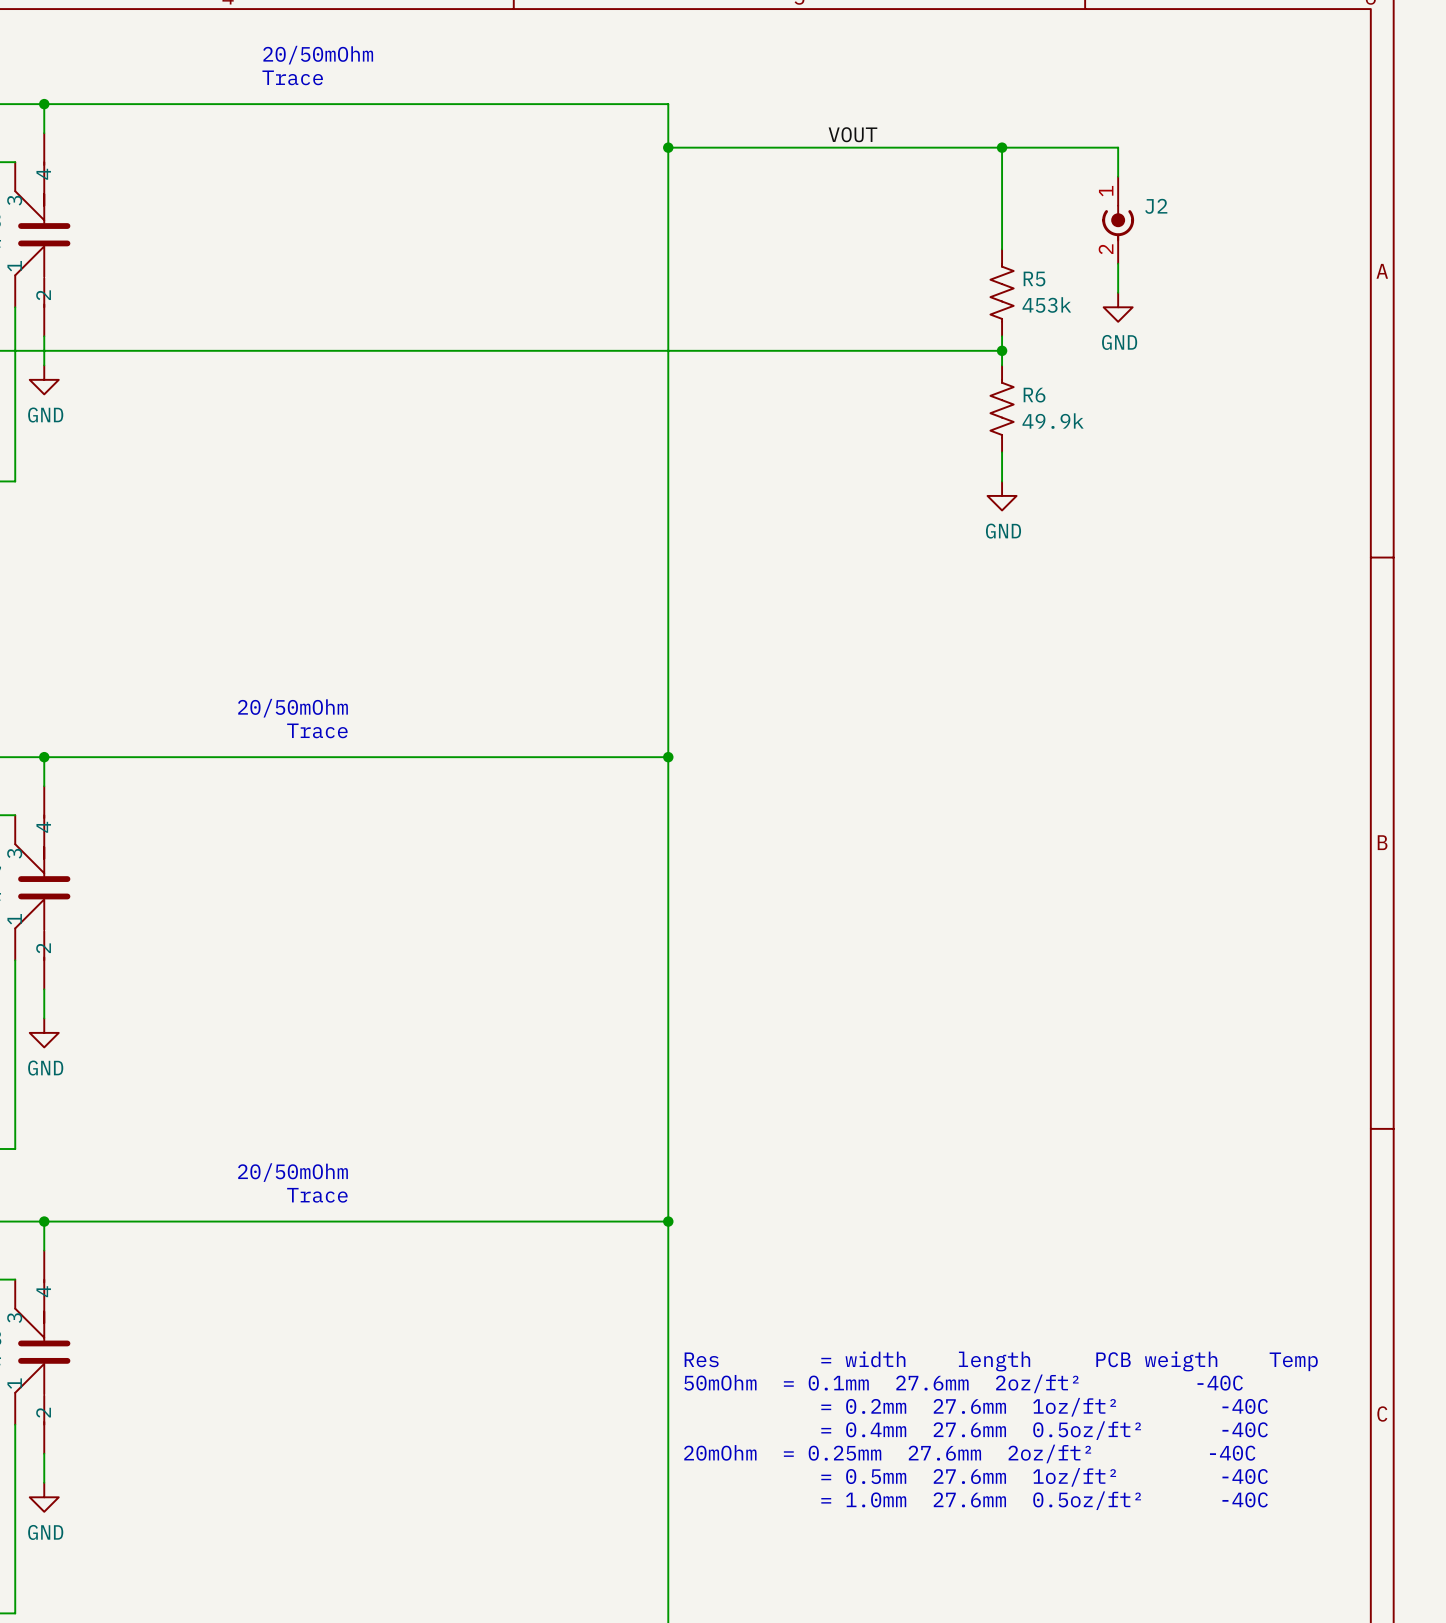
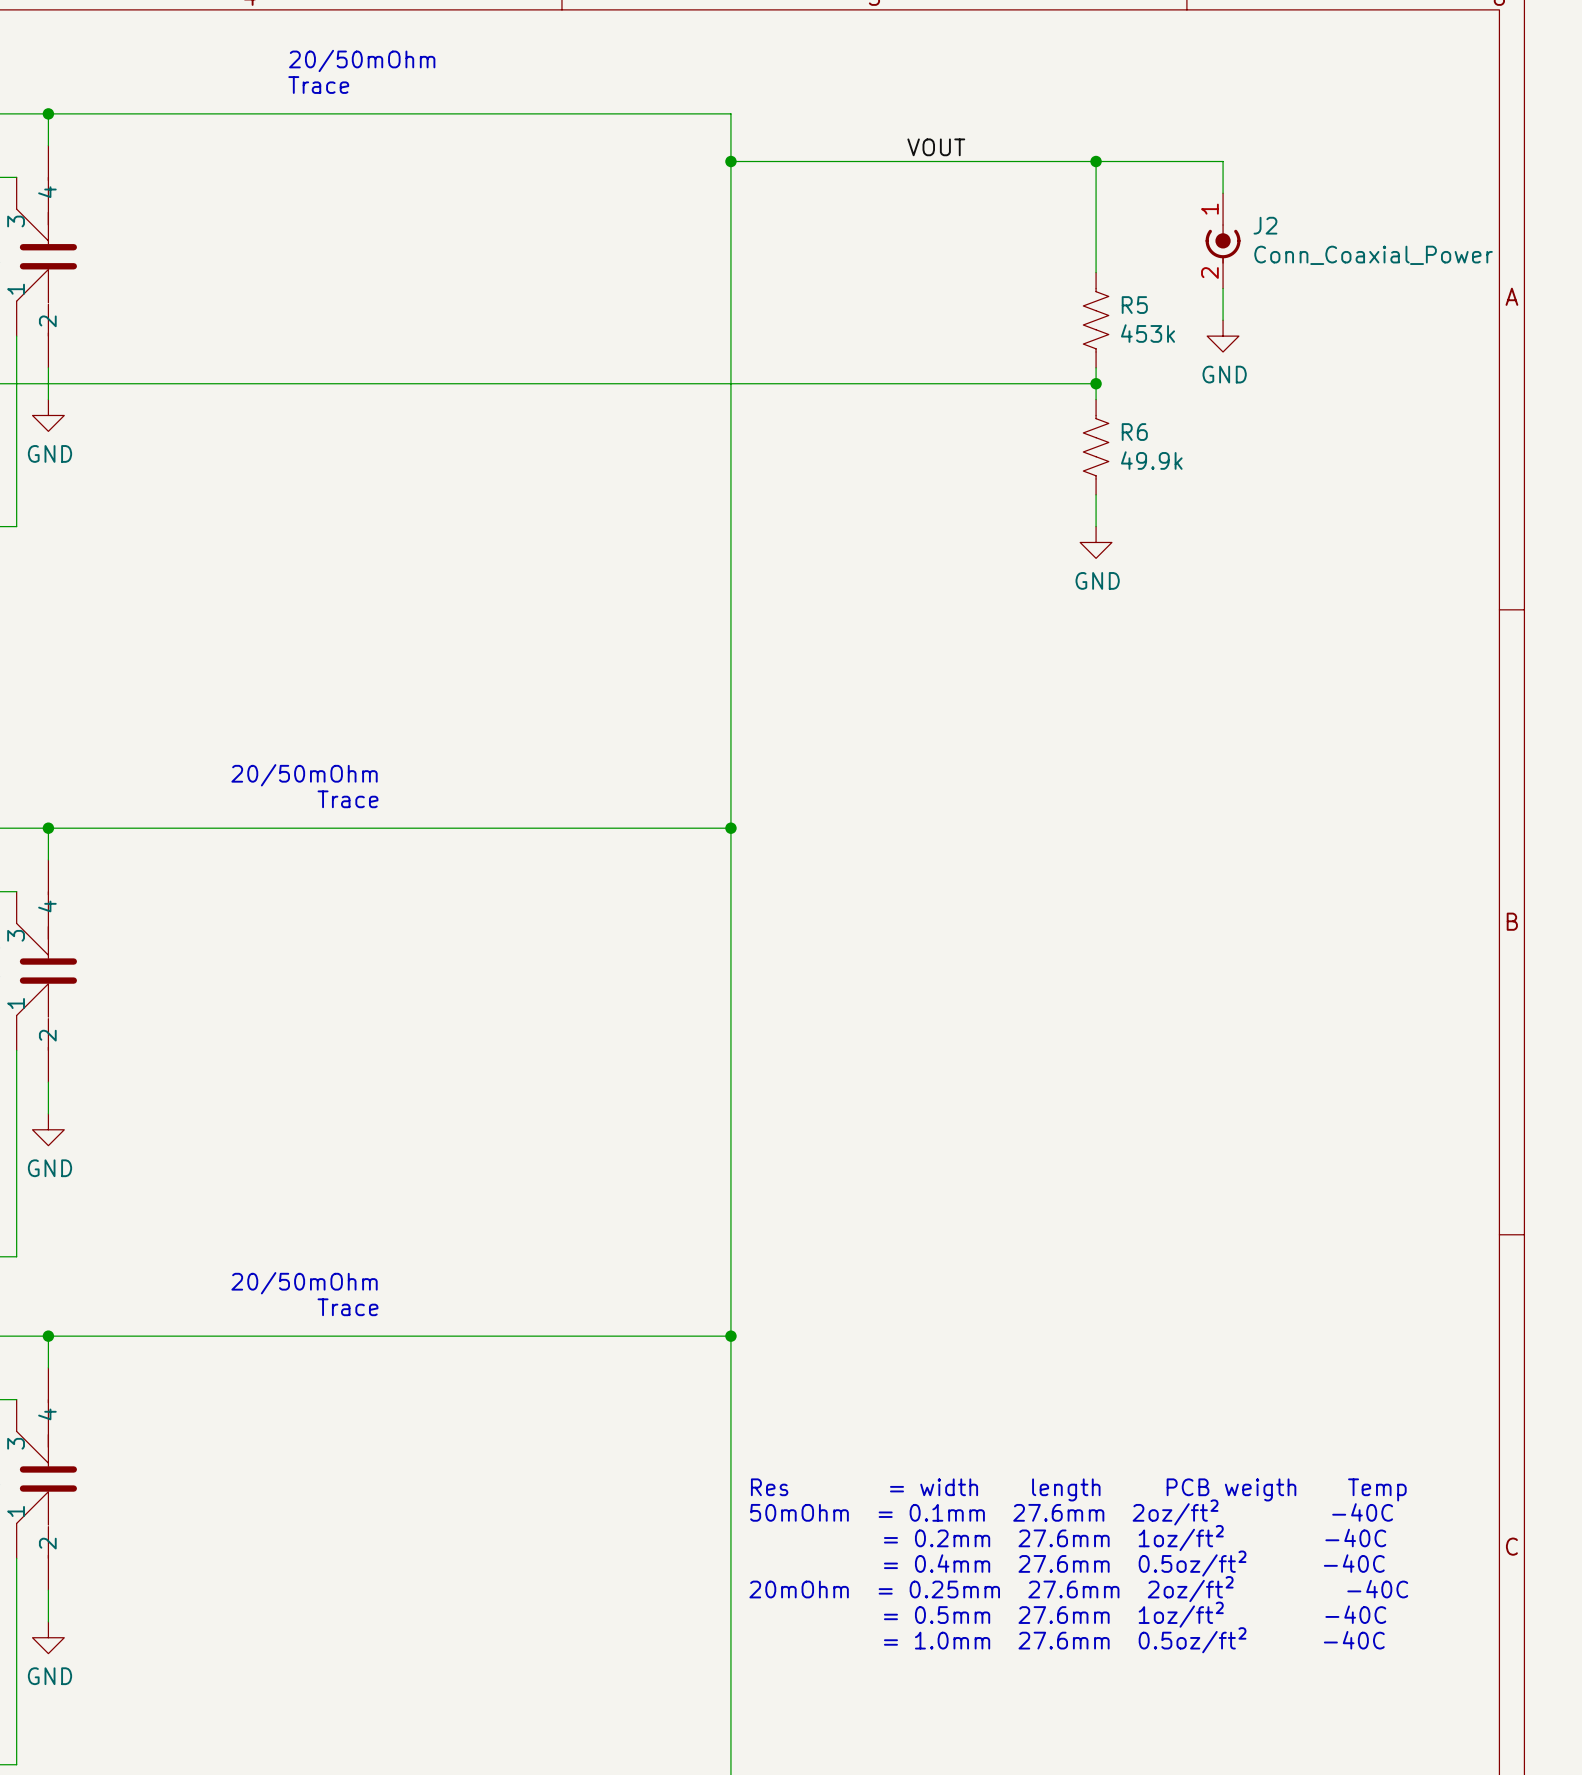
J2 value: none -> Conn_Coaxial_Power (1373, 255)

